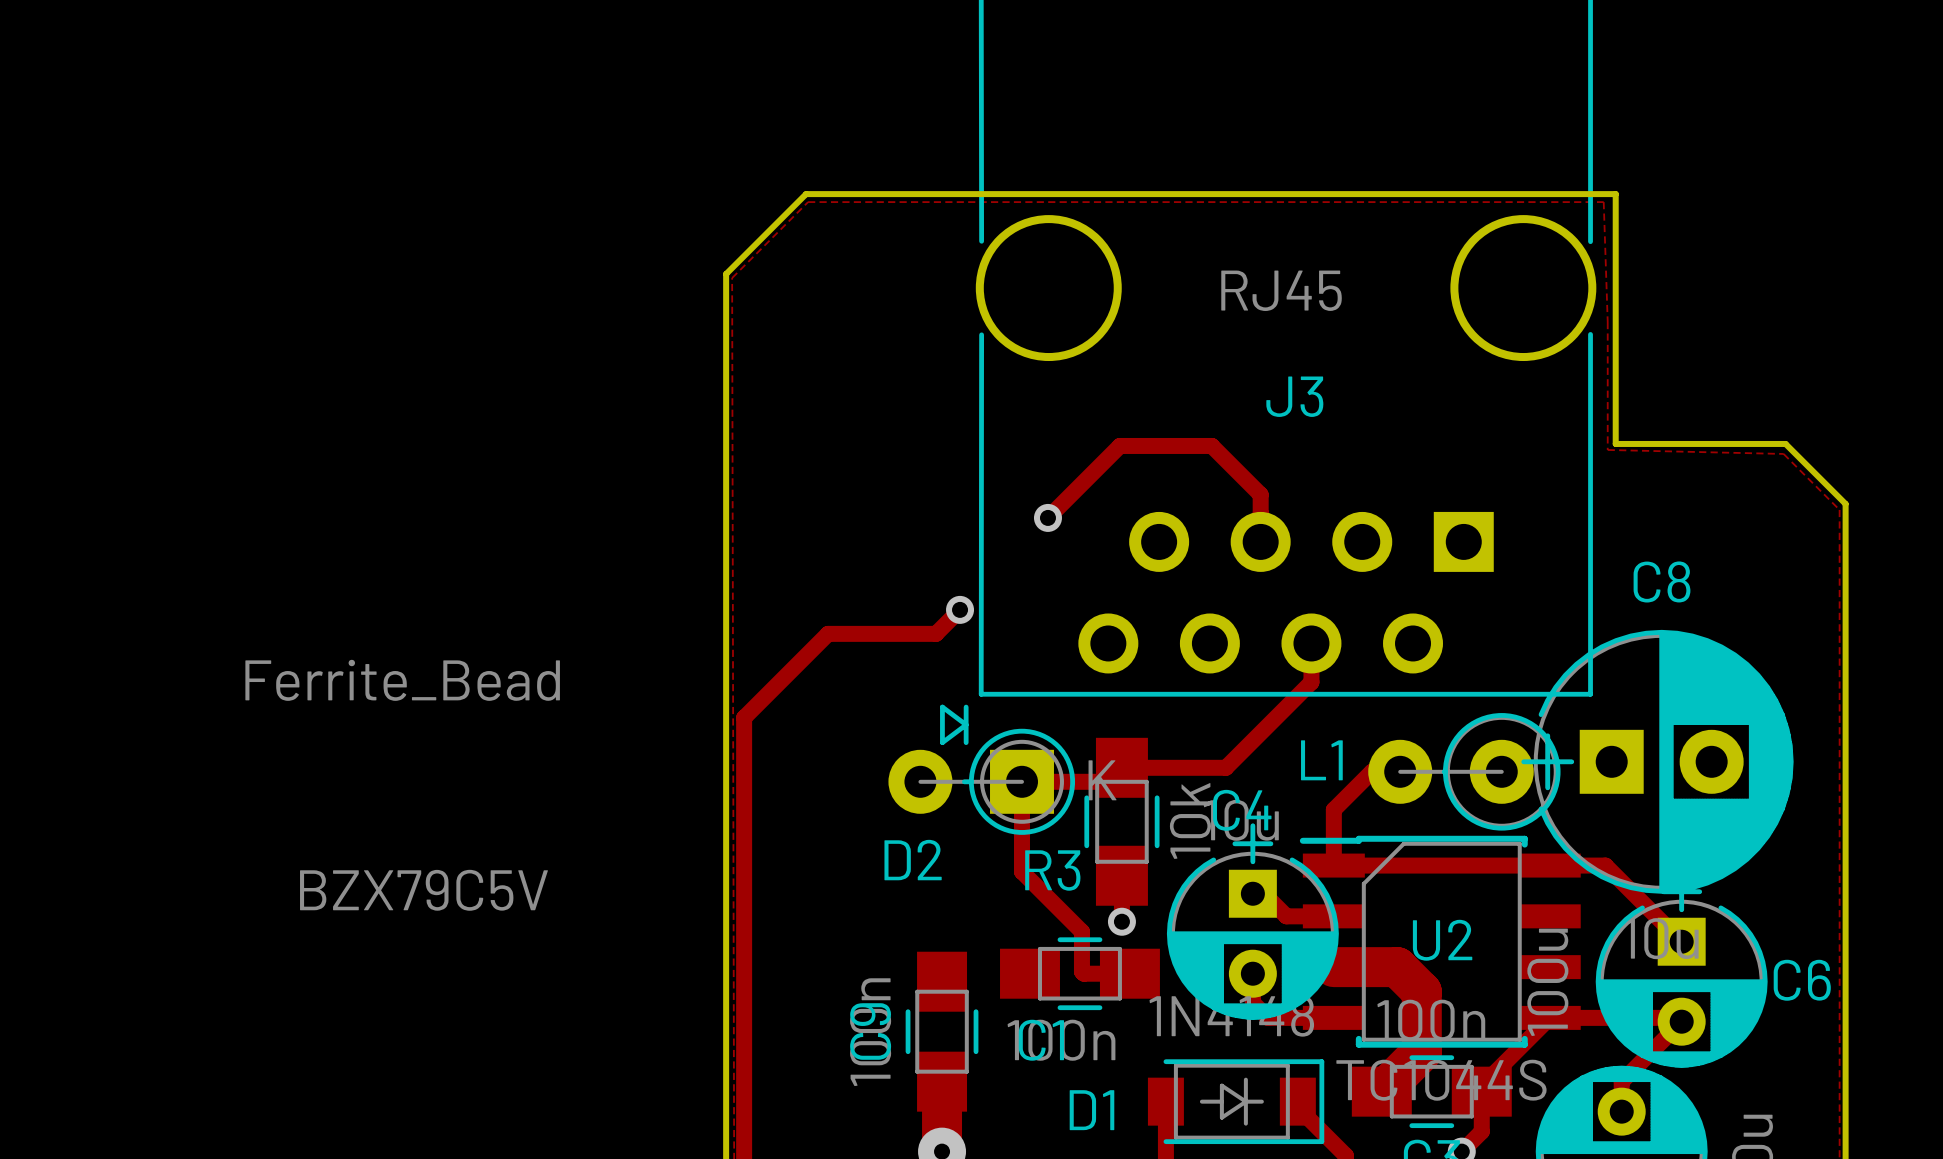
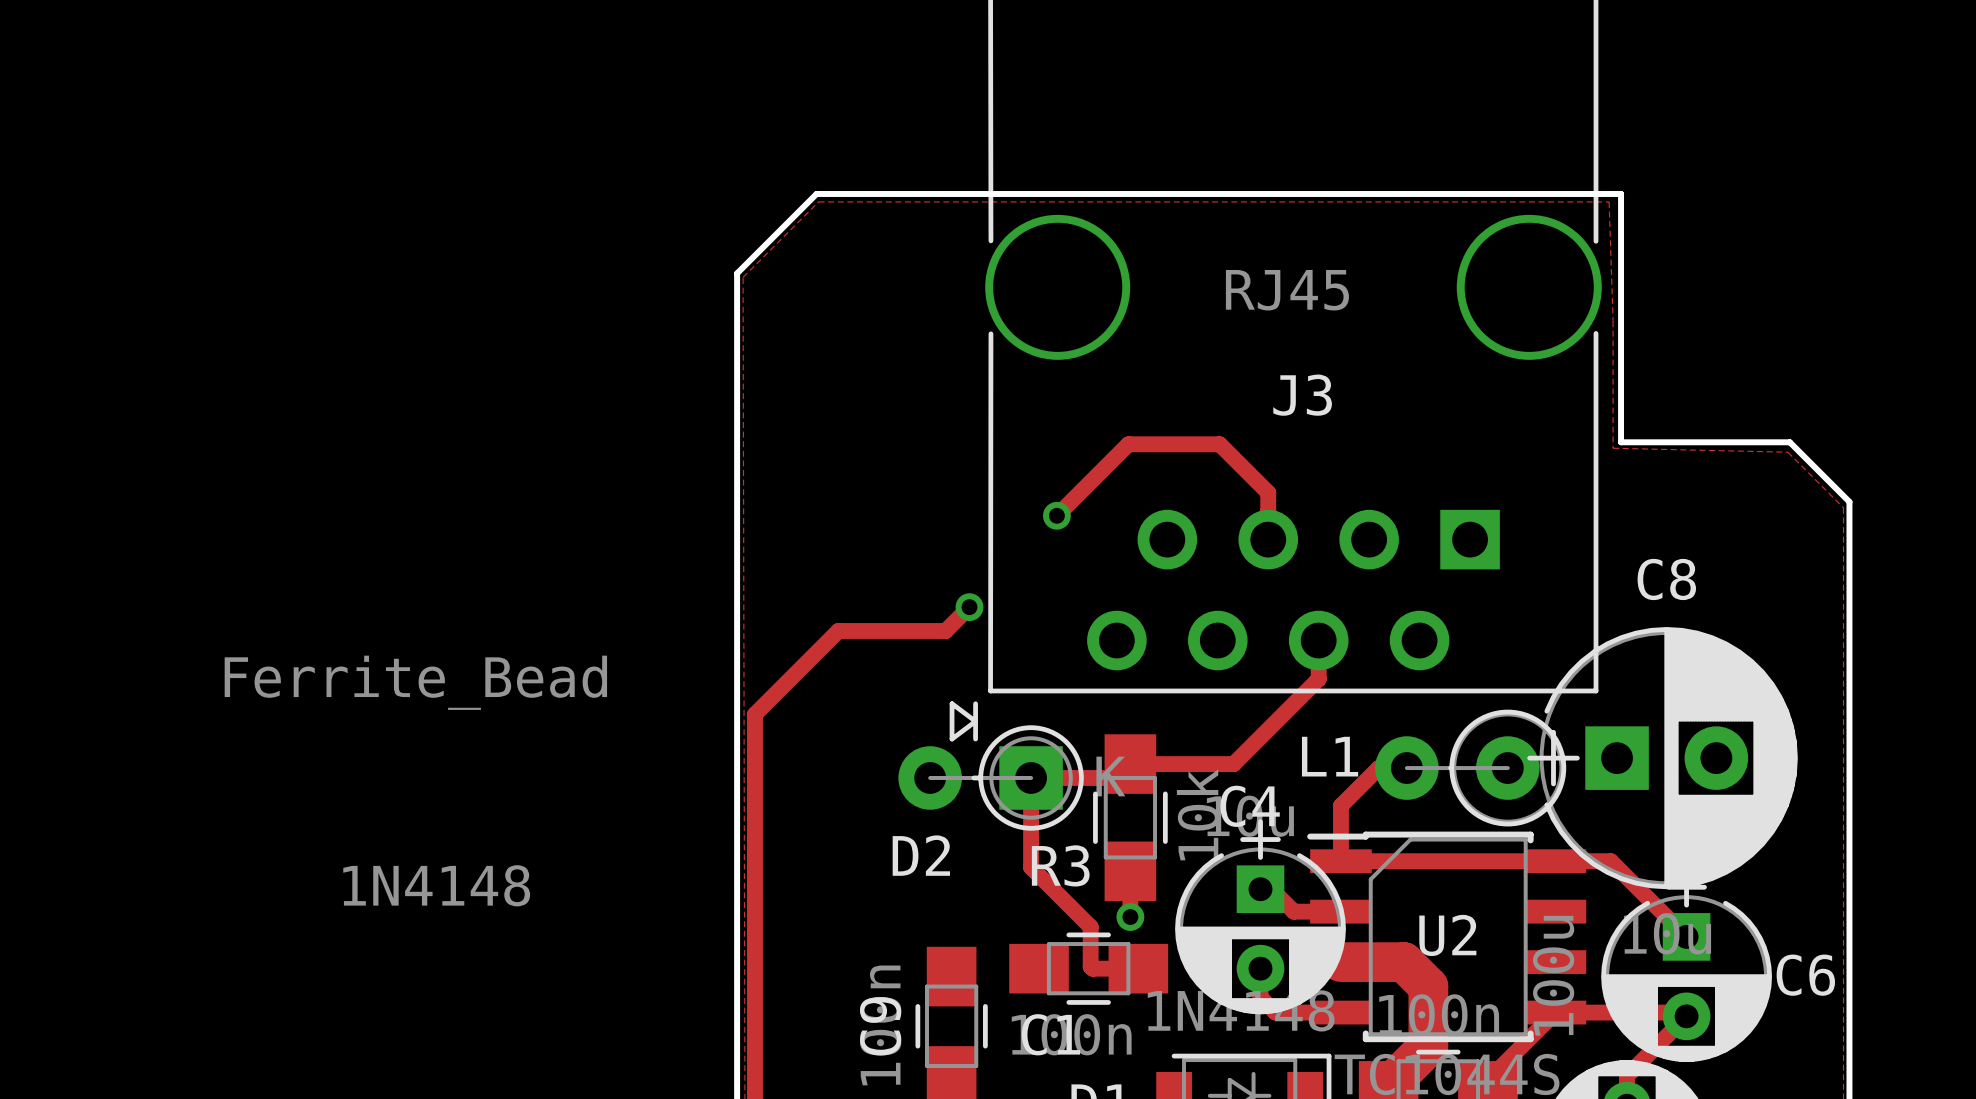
D2 value: BZX79C5V (424, 890) -> 1N4148 (436, 885)

